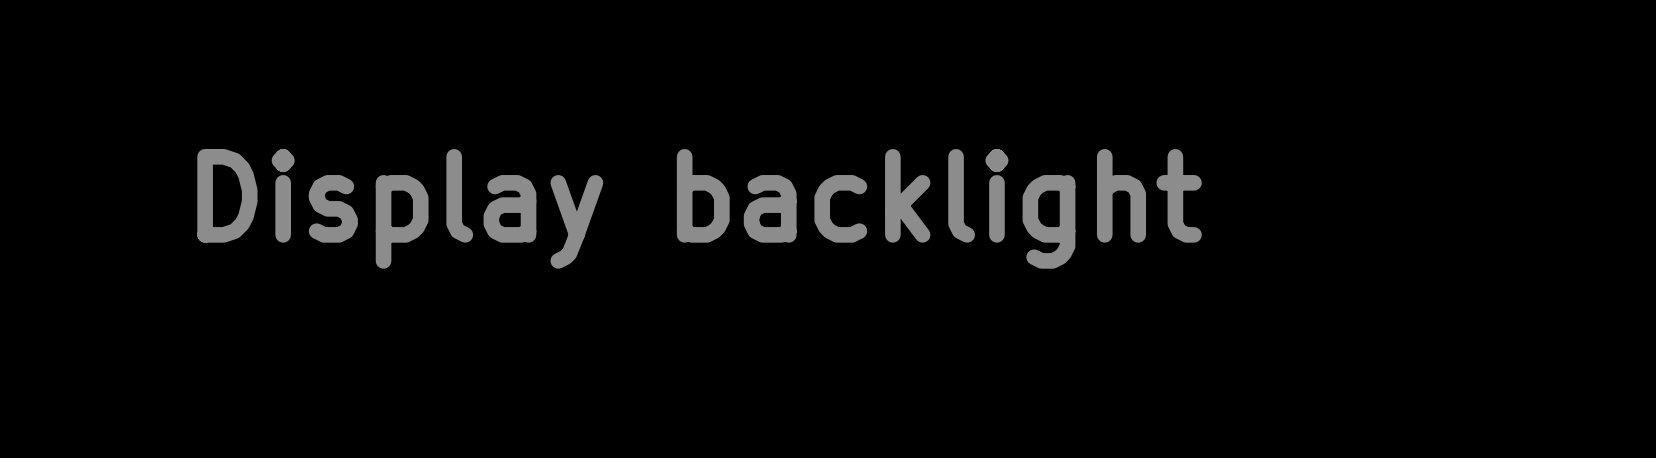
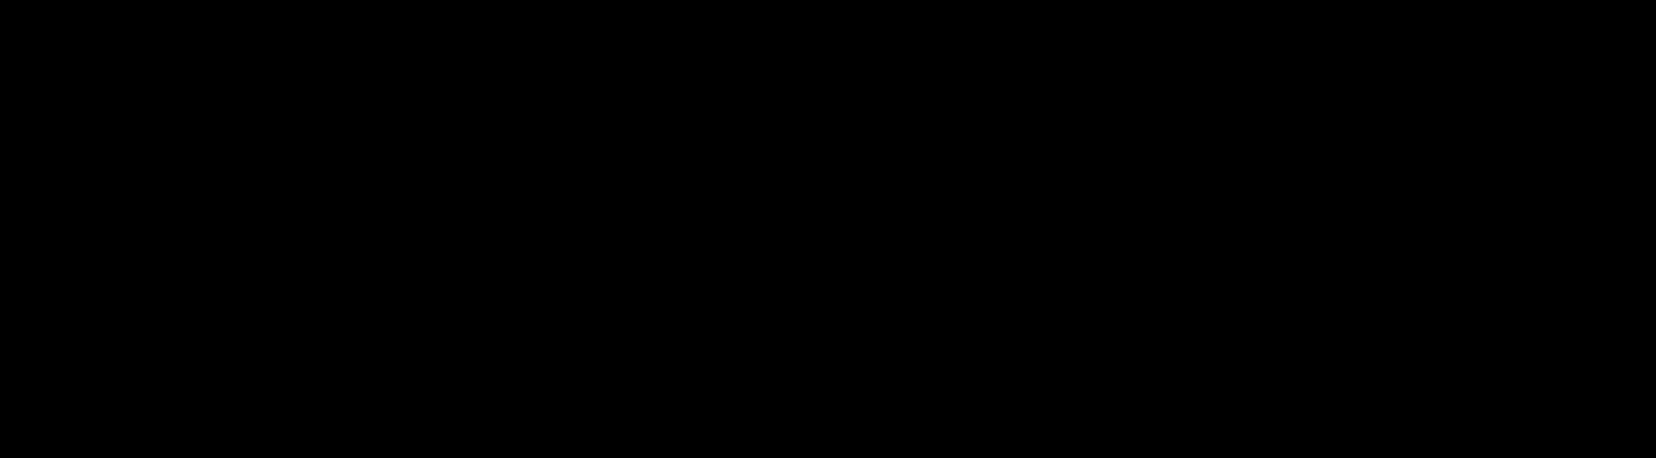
text: Display backlight (699, 208) -> none

